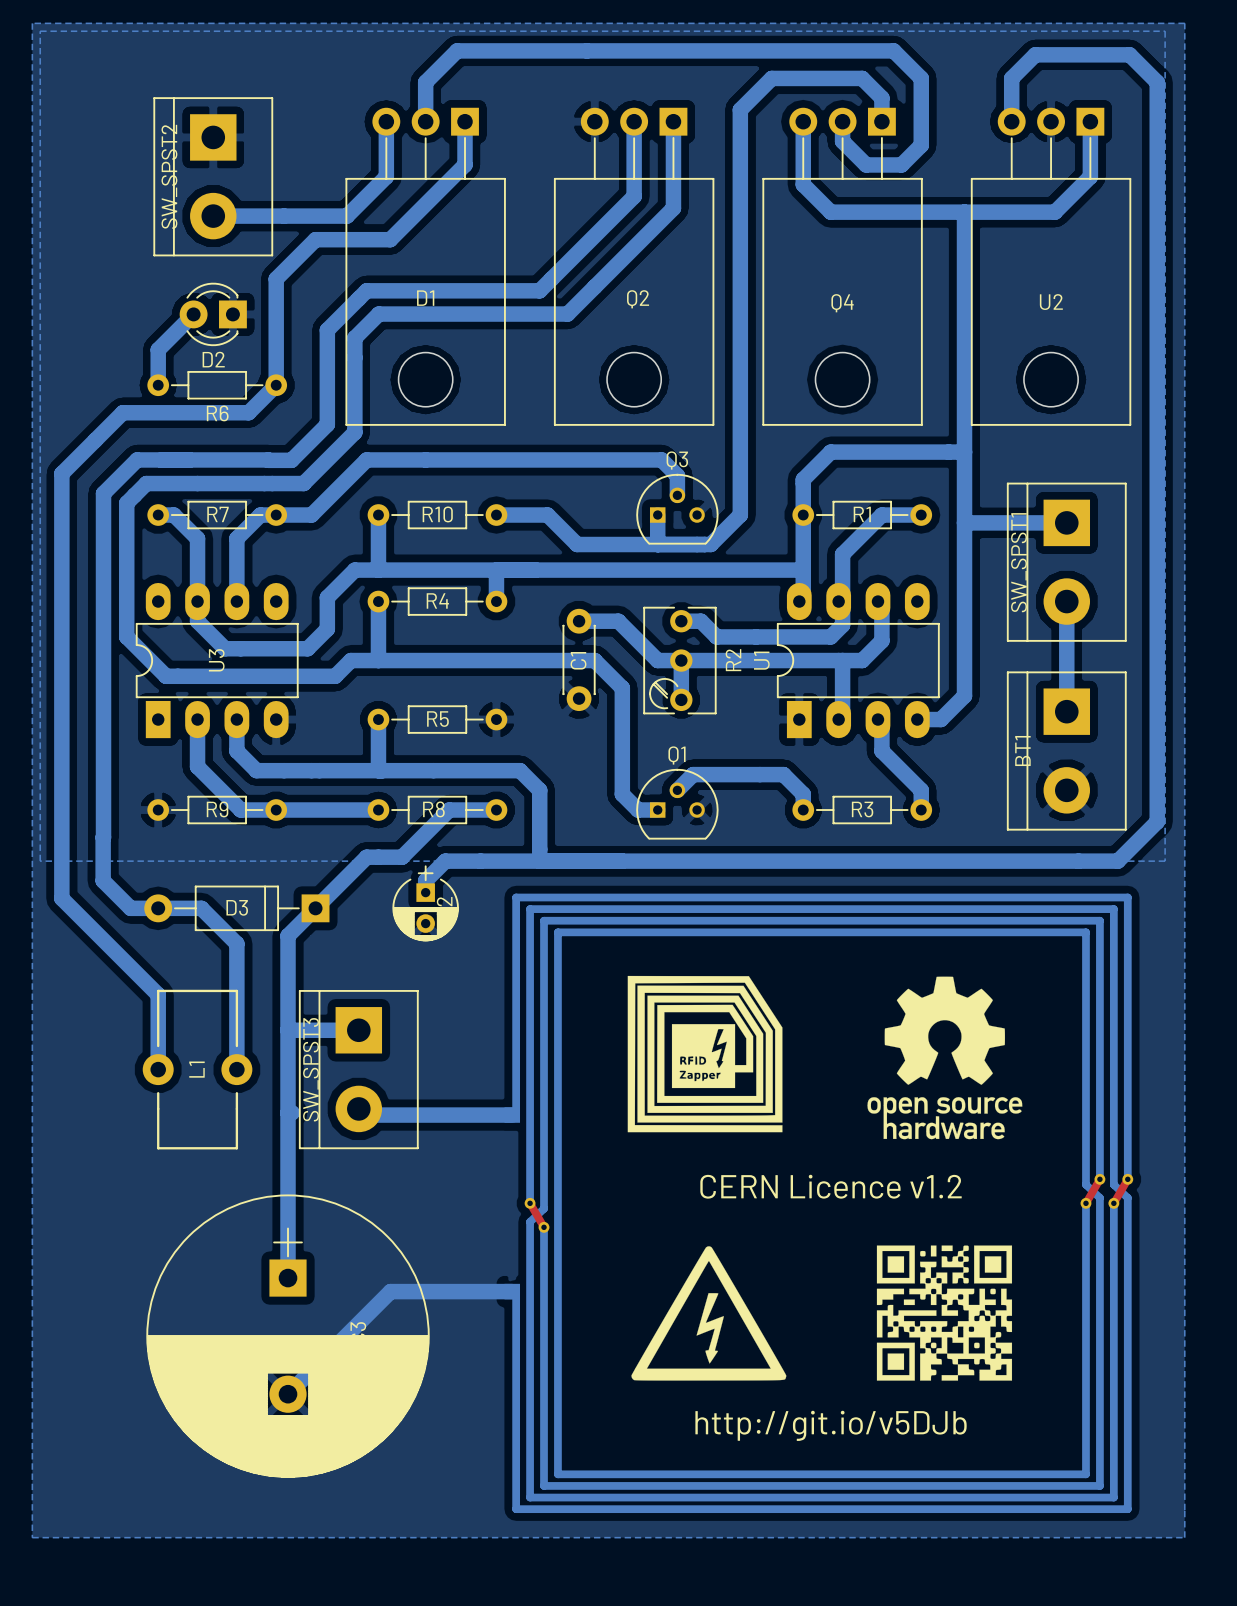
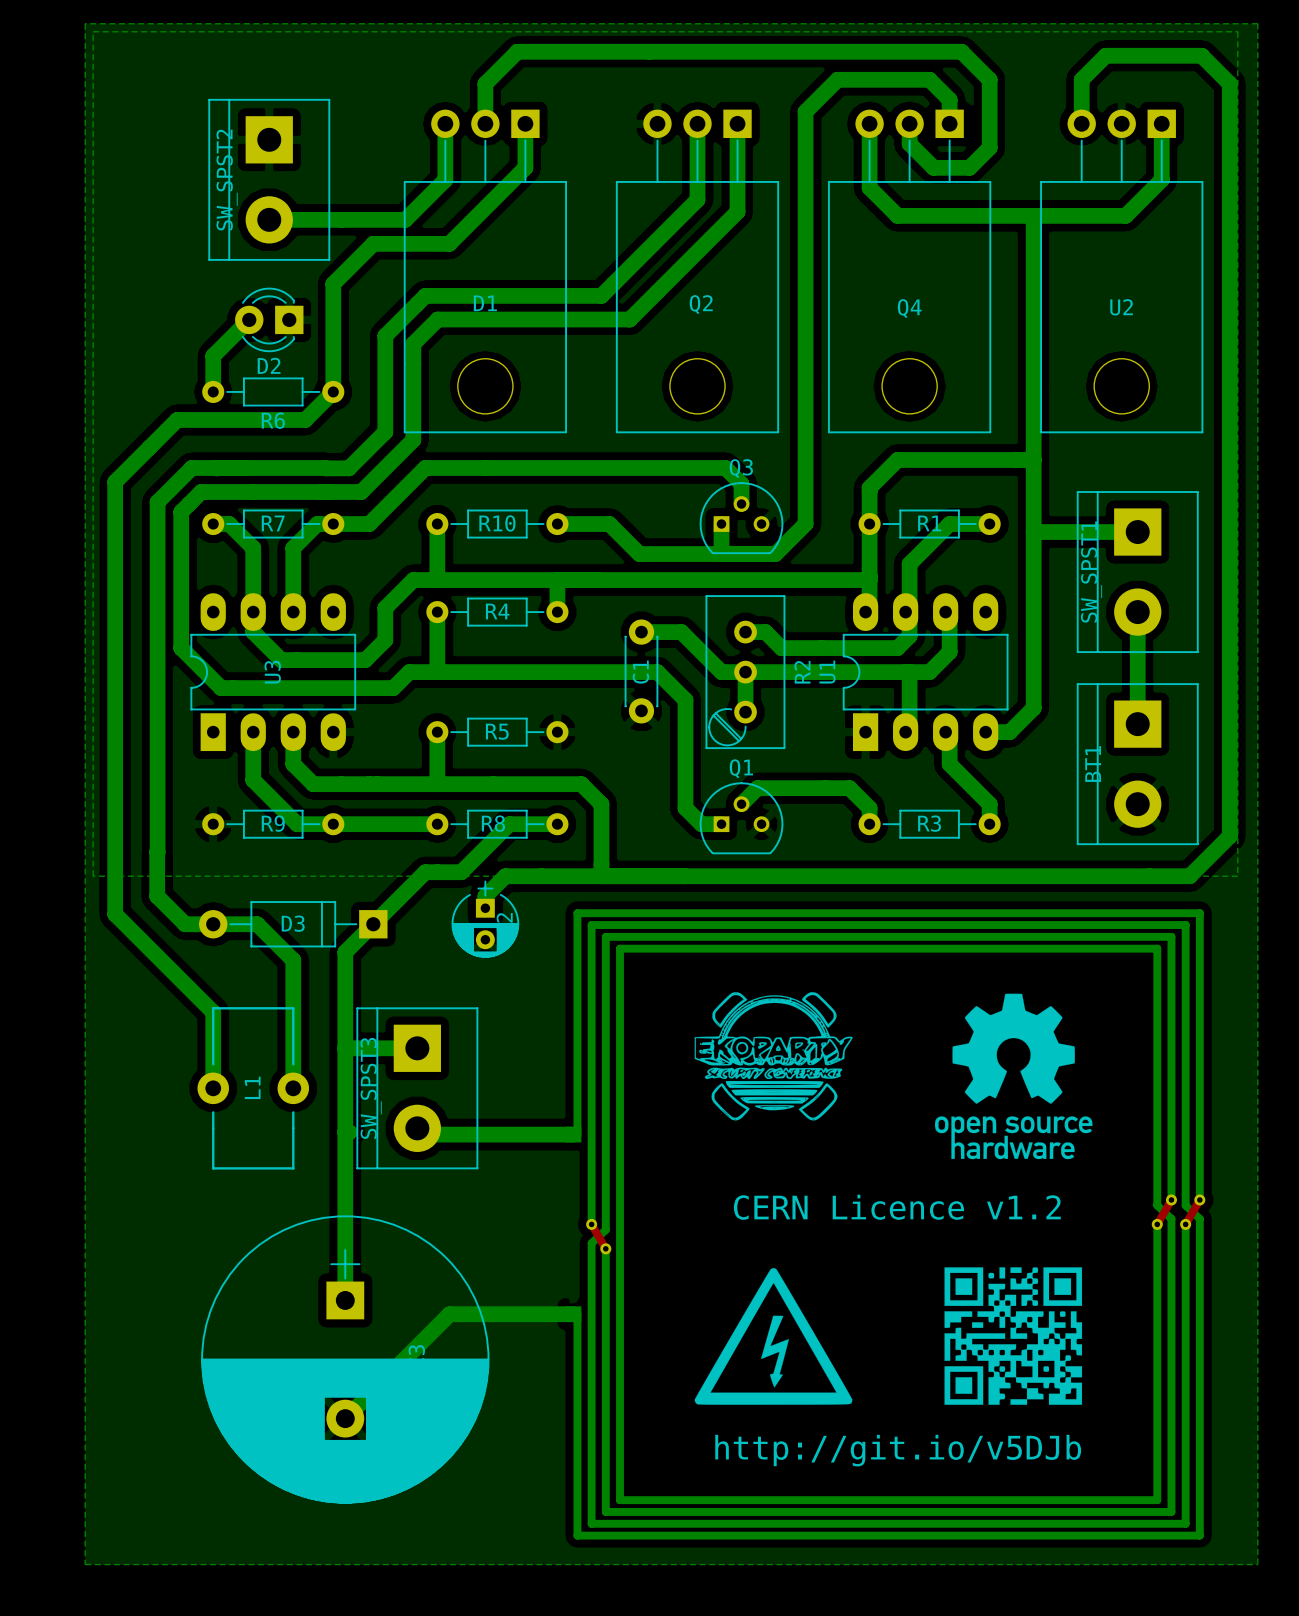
R2 footprint: [643, 606, 717, 715] -> [705, 595, 786, 750]
drawing: [627, 975, 783, 1133] -> none
drawing: none -> [694, 992, 853, 1121]

